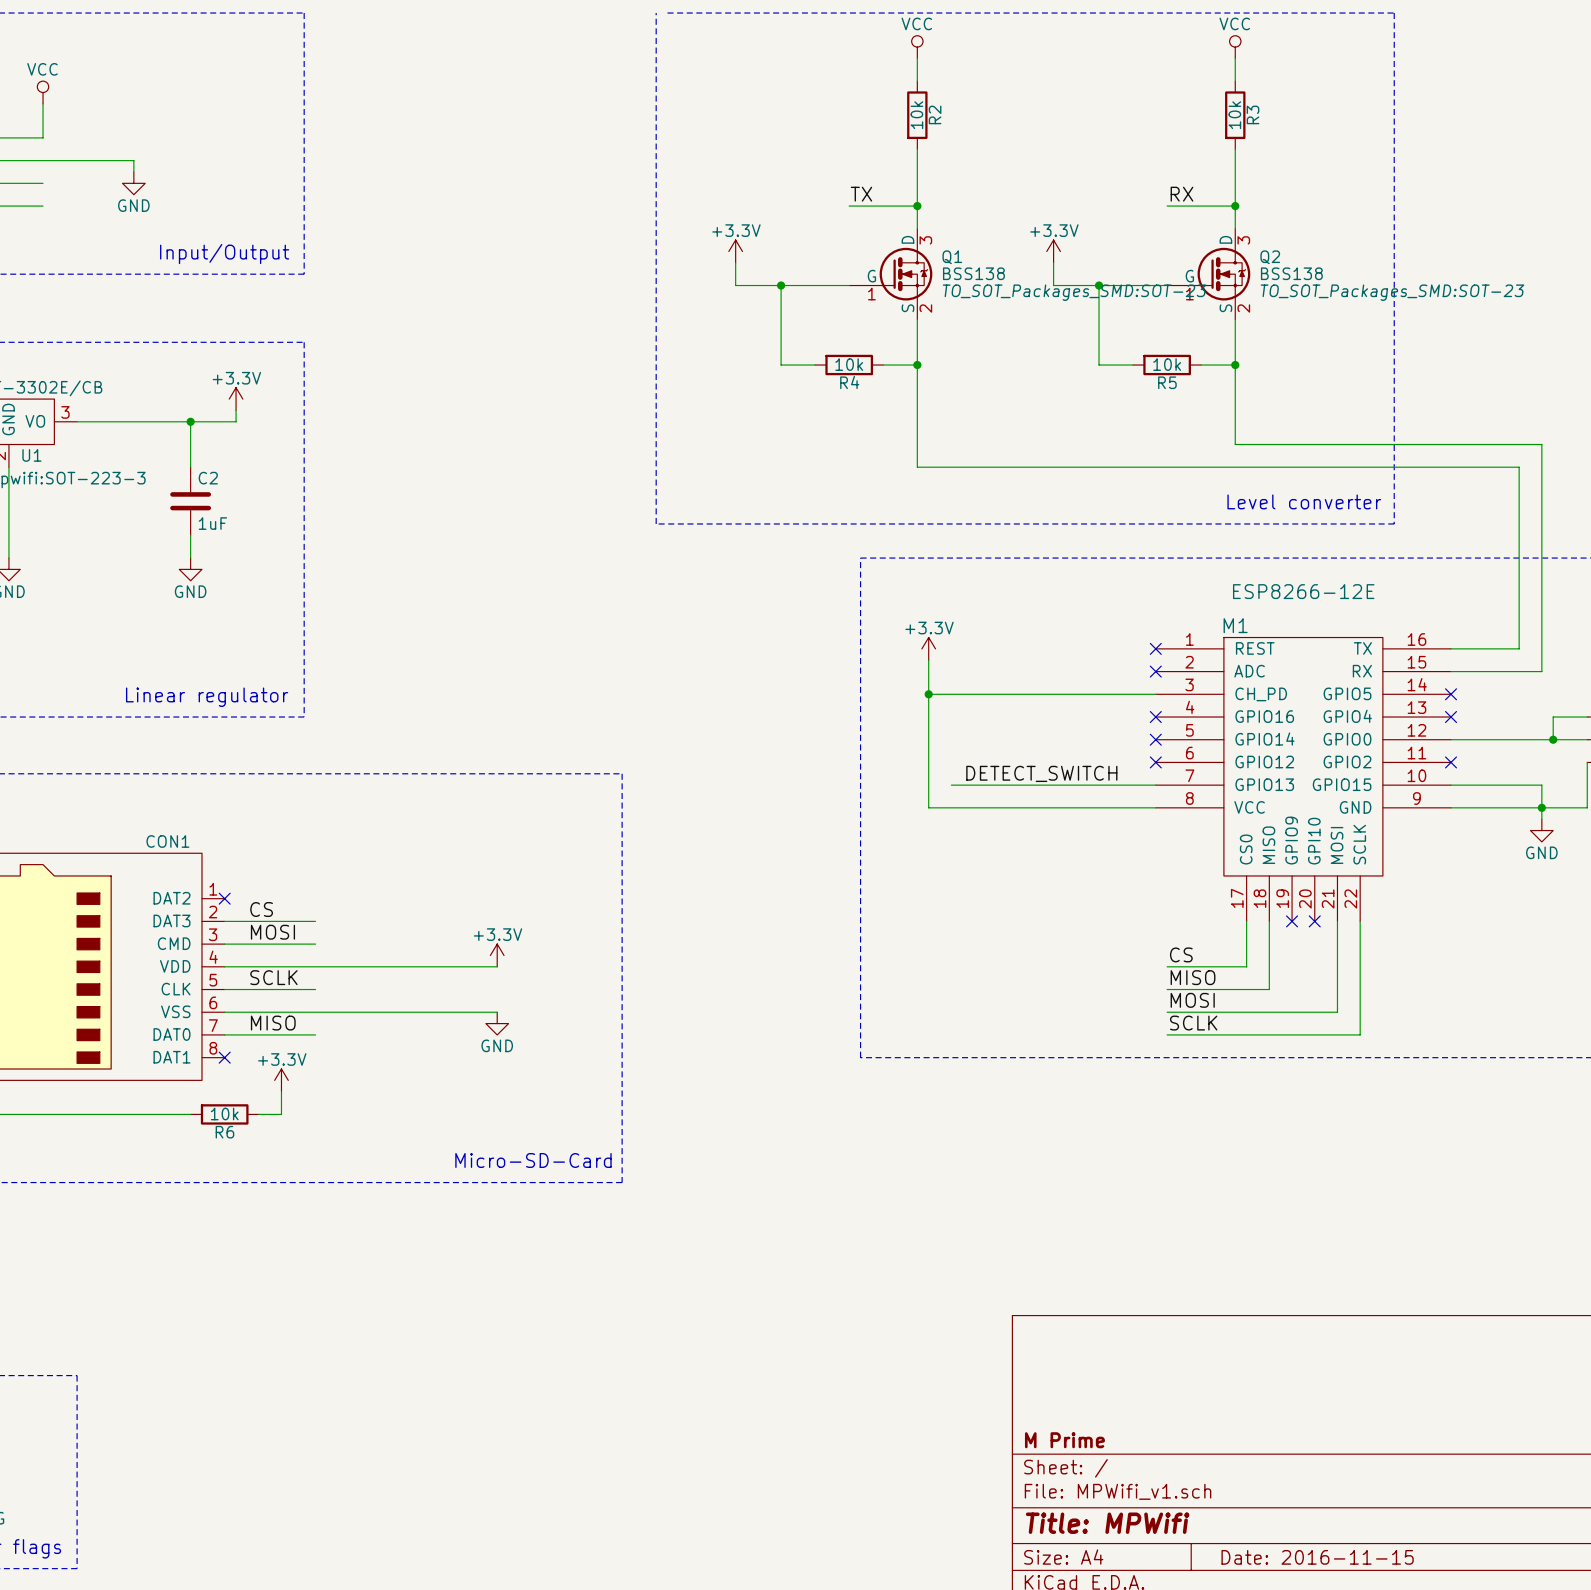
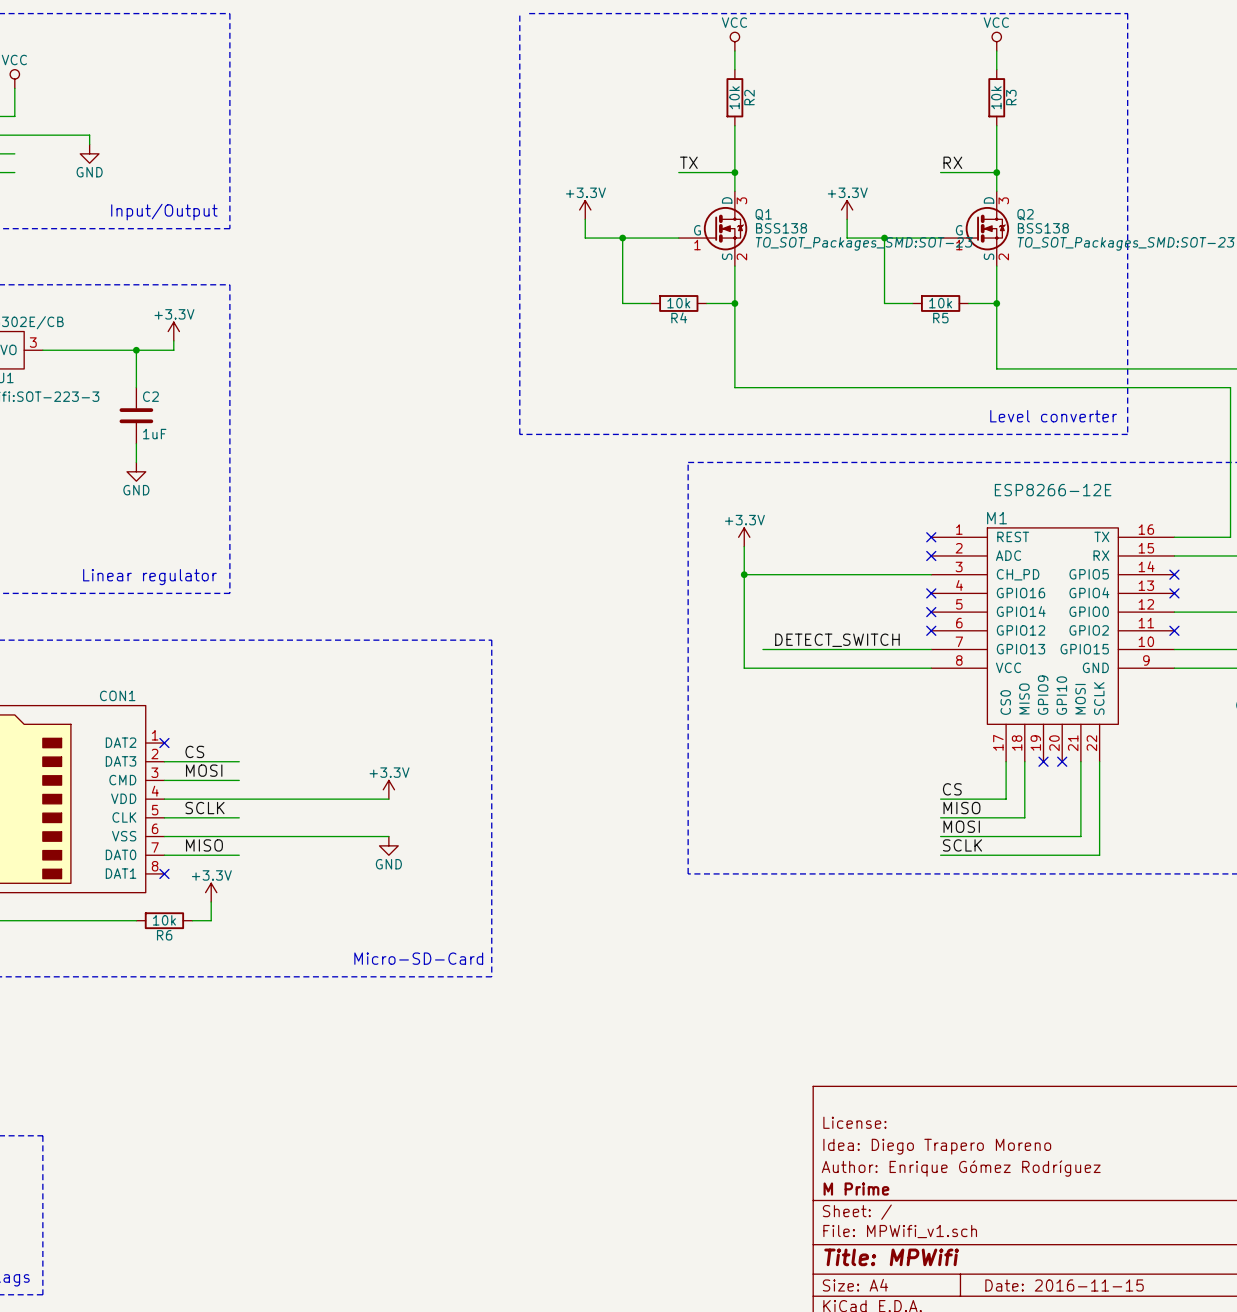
title block: none -> License: (854, 1122)
title block: none -> Idea: Diego Trapero Moreno (937, 1146)
title block: none -> Author: Enrique Gómez Rodríguez (961, 1168)

